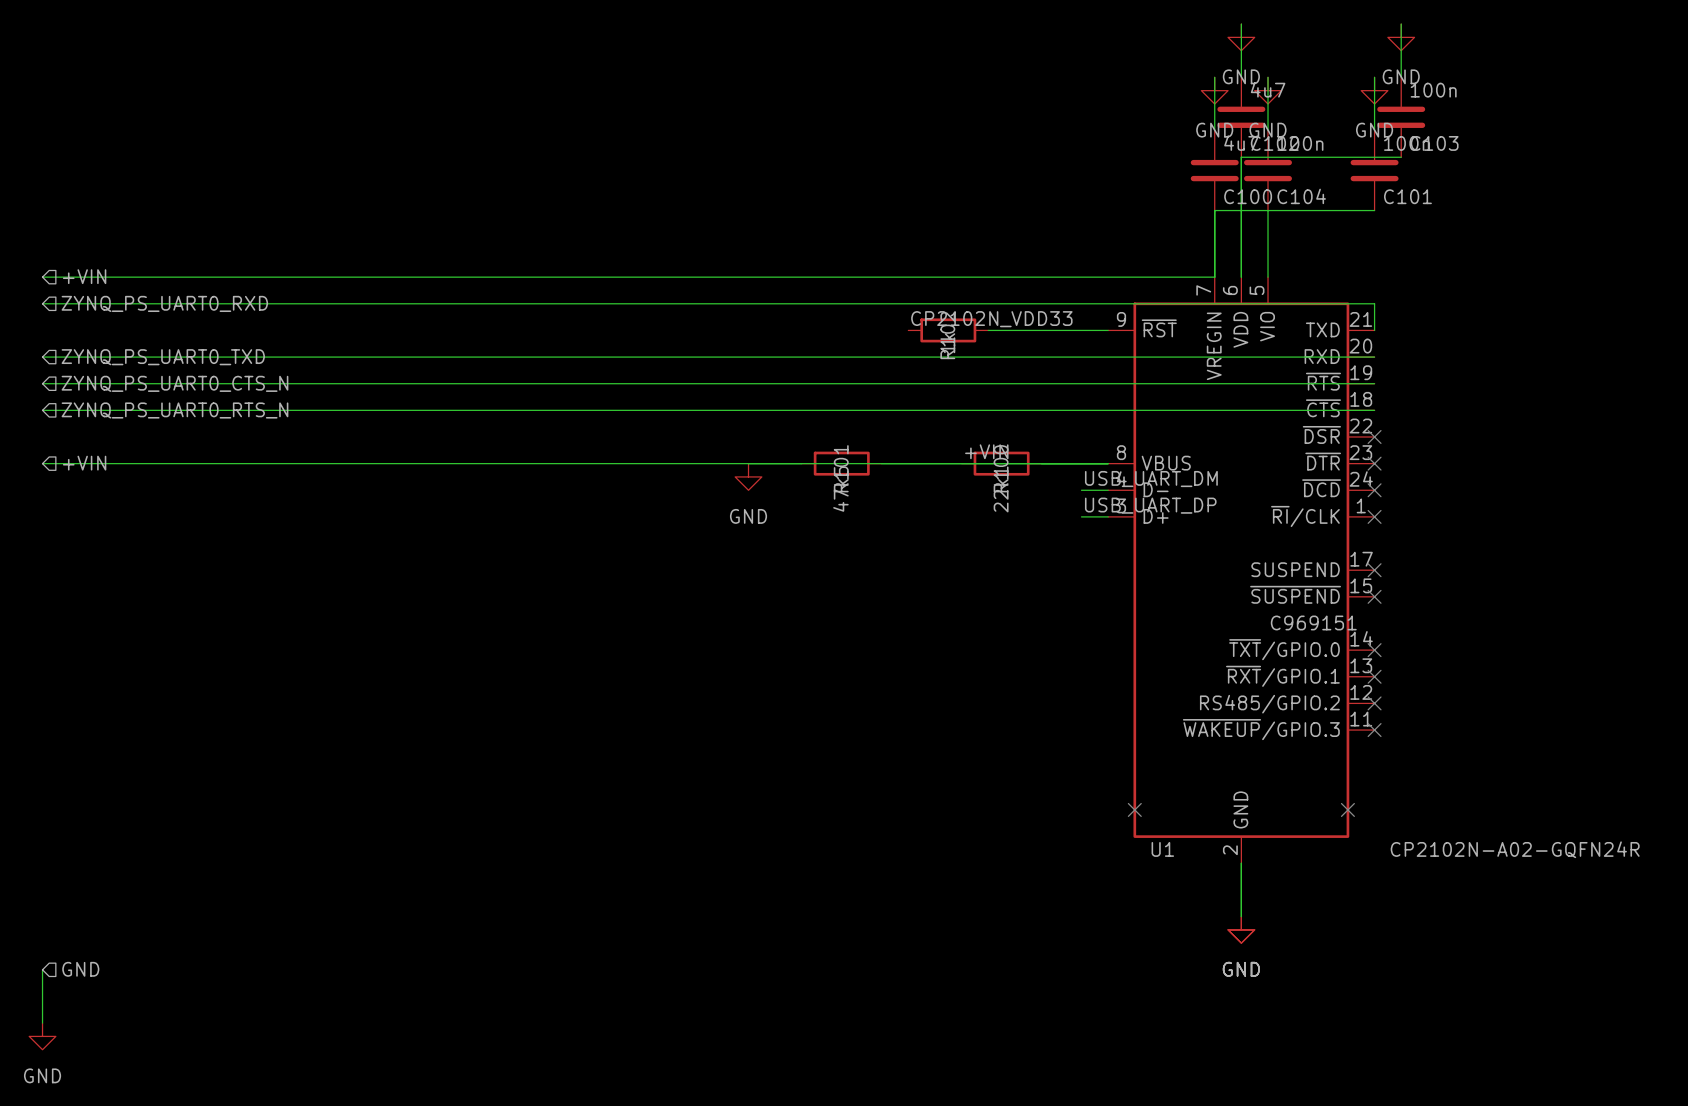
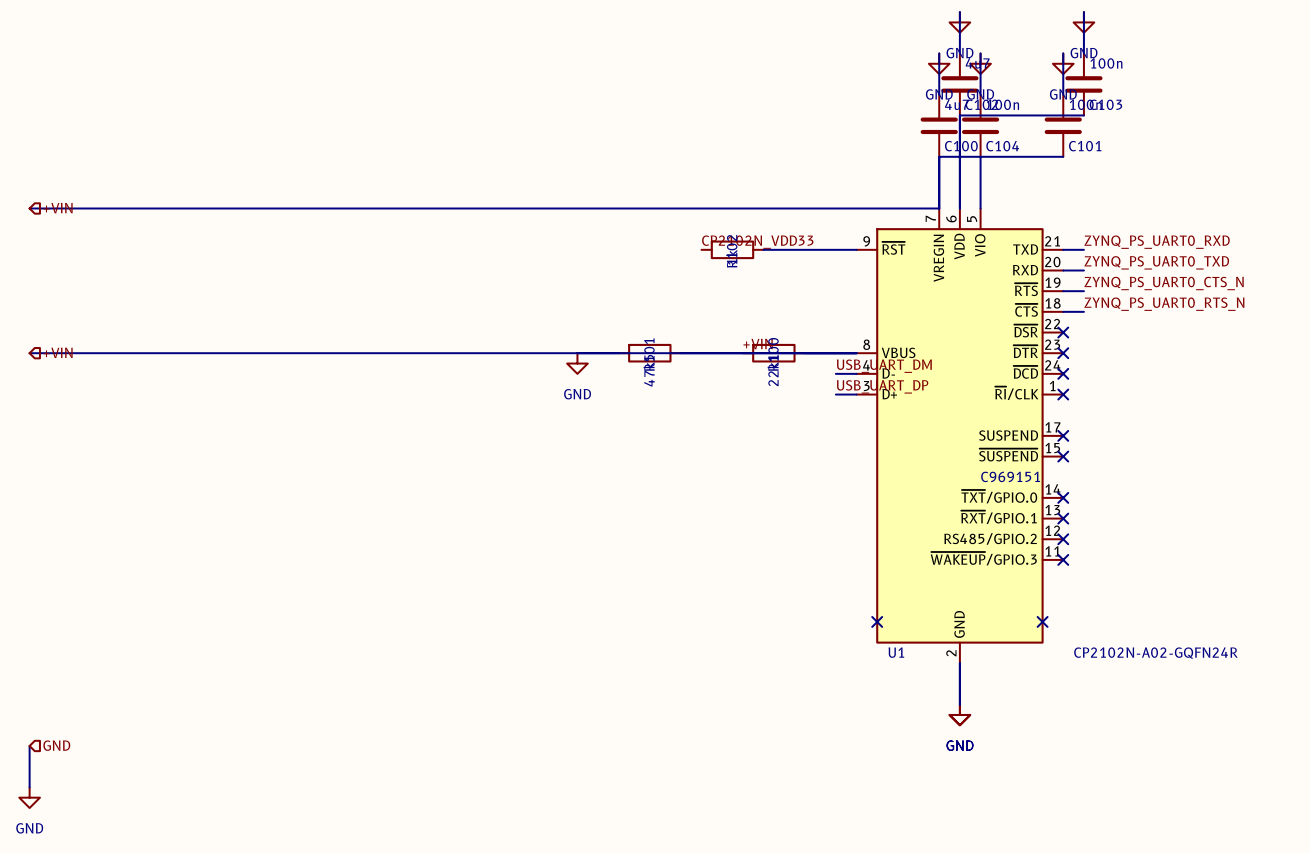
wire: (42, 303) (1374, 303) (1374, 330) -> (1083, 249) (1063, 249)
hierarchical label: ZYNQ_PS_UART0_RXD (164, 303) -> none
label: none -> ZYNQ_PS_UART0_RXD (1157, 242)
label: none -> ZYNQ_PS_UART0_TXD (1156, 262)
wire: (42, 357) (1374, 357) -> (1083, 270) (1063, 270)
hierarchical label: ZYNQ_PS_UART0_TXD (163, 357) -> none
label: none -> ZYNQ_PS_UART0_CTS_N (1164, 283)
wire: (42, 383) (1374, 383) -> (1083, 291) (1063, 291)
hierarchical label: ZYNQ_PS_UART0_CTS_N (174, 383) -> none
label: none -> ZYNQ_PS_UART0_RTS_N (1164, 304)
wire: (42, 410) (1374, 410) -> (1083, 311) (1063, 311)
hierarchical label: ZYNQ_PS_UART0_RTS_N (174, 410) -> none

